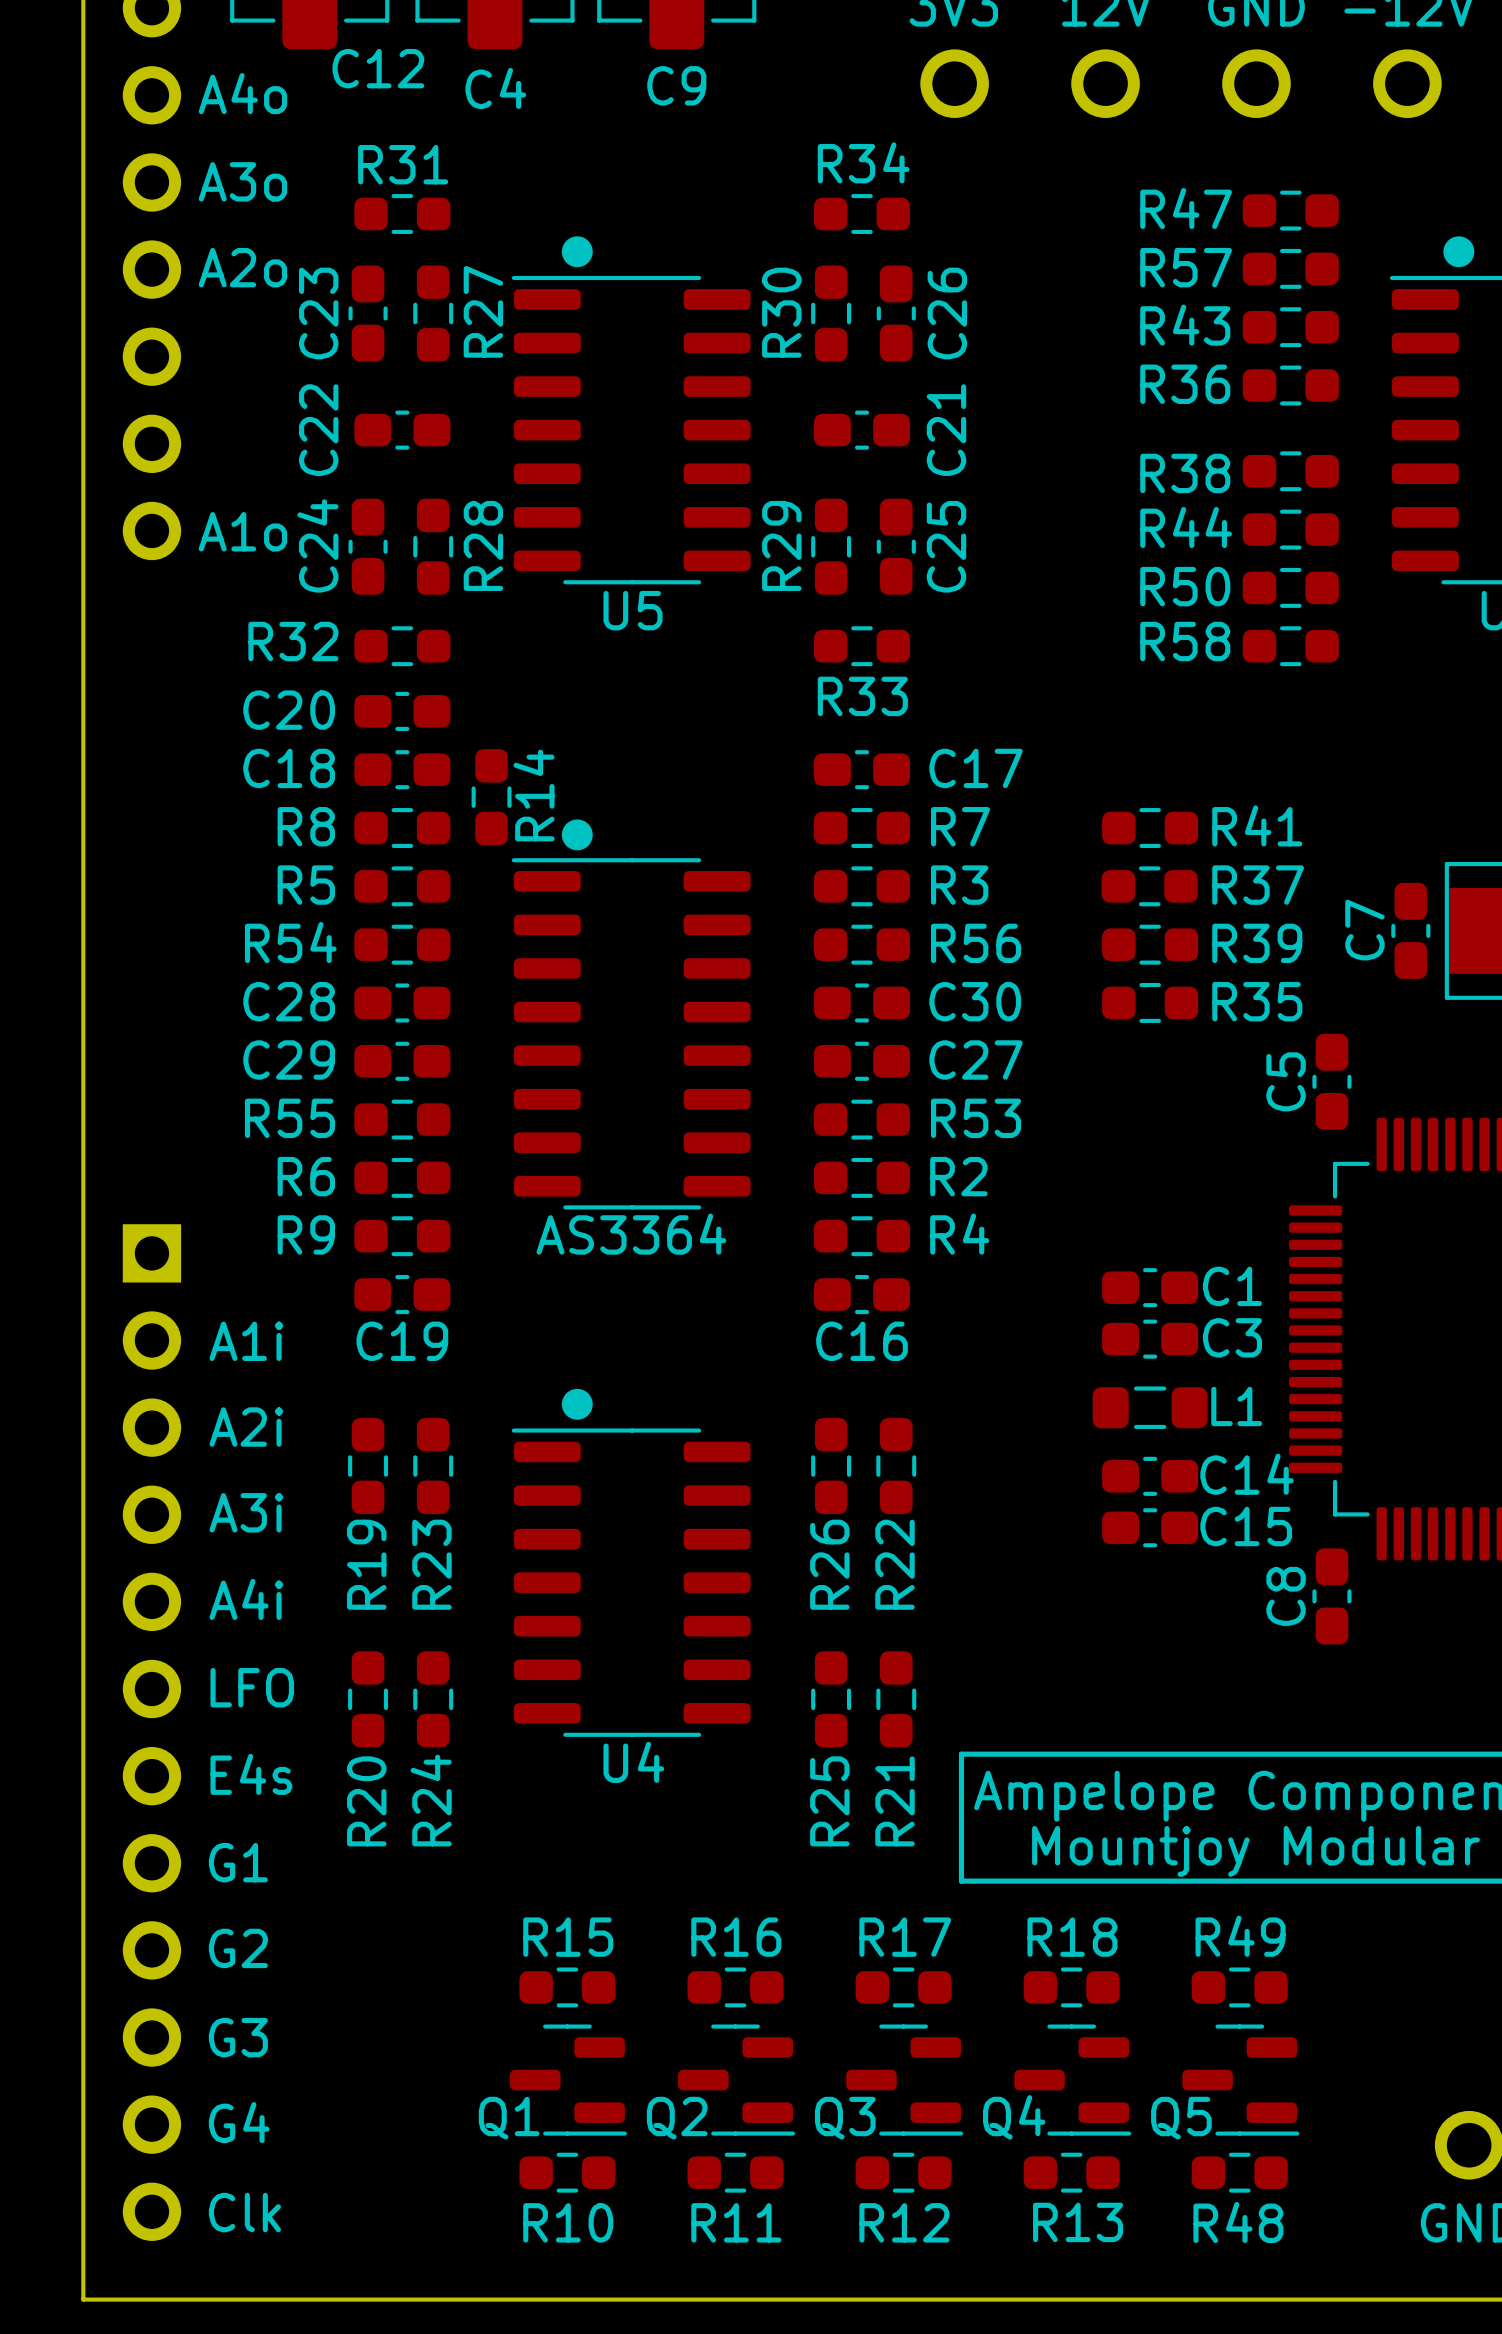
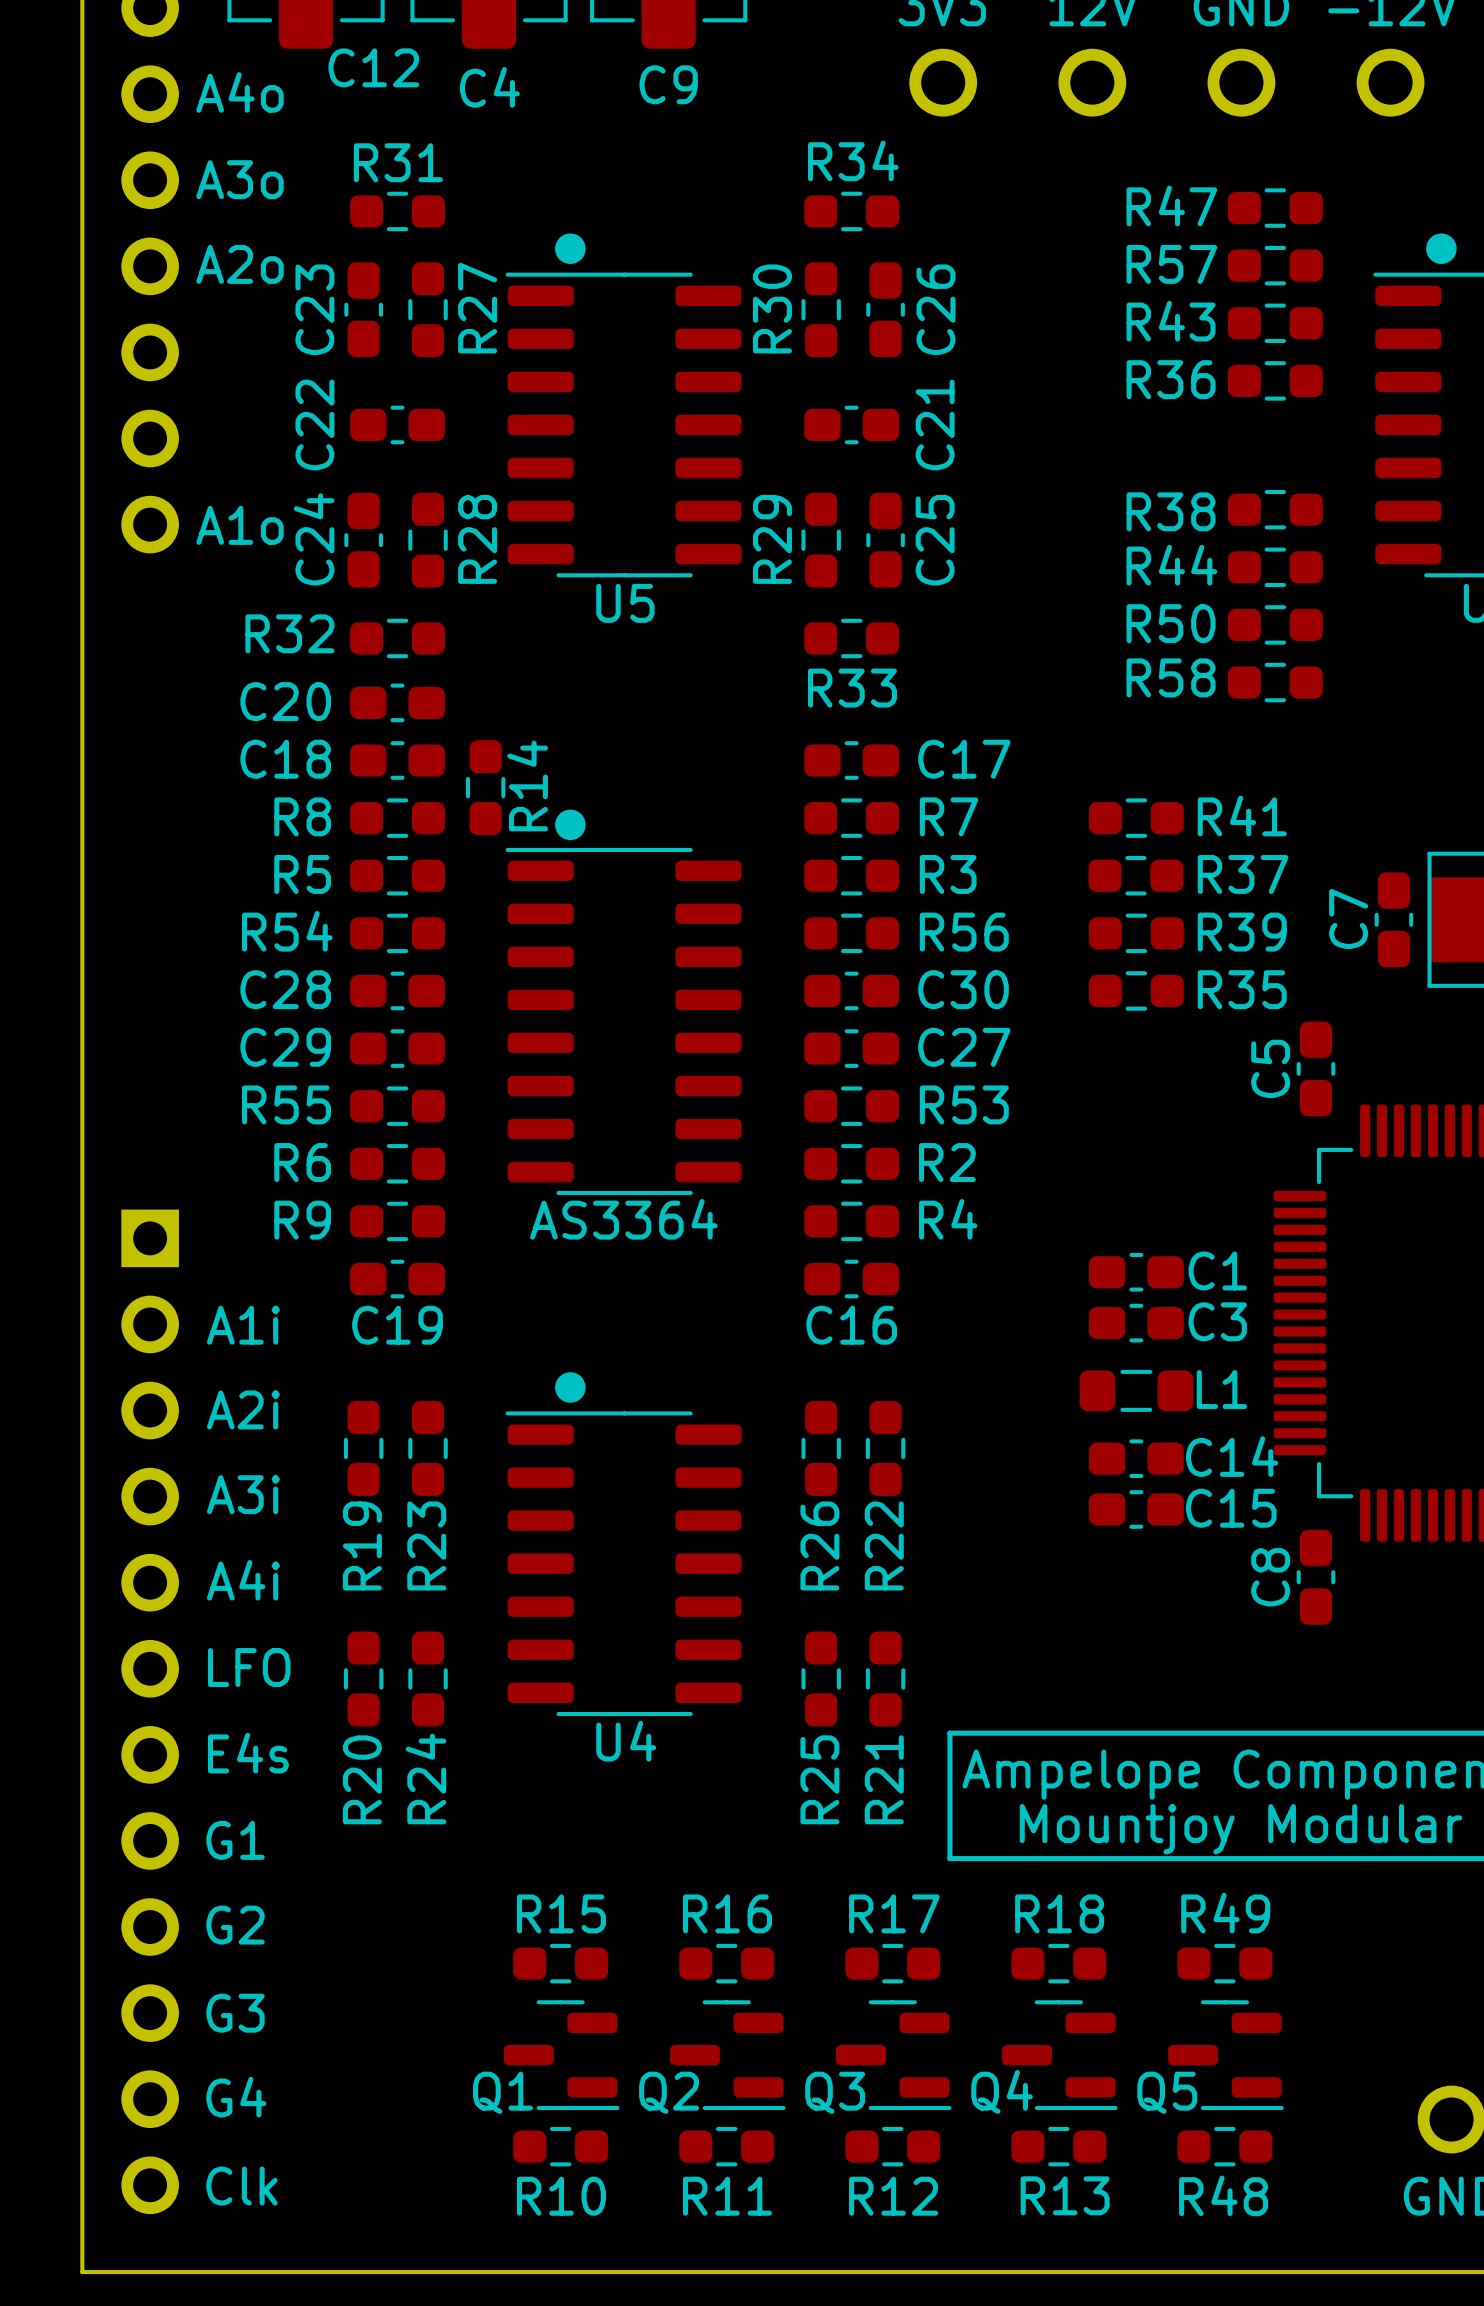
R38 position: (1290, 471) -> (1275, 509)
R44 position: (1290, 529) -> (1275, 567)
R50 position: (1290, 587) -> (1275, 624)
R58 position: (1290, 646) -> (1275, 682)

